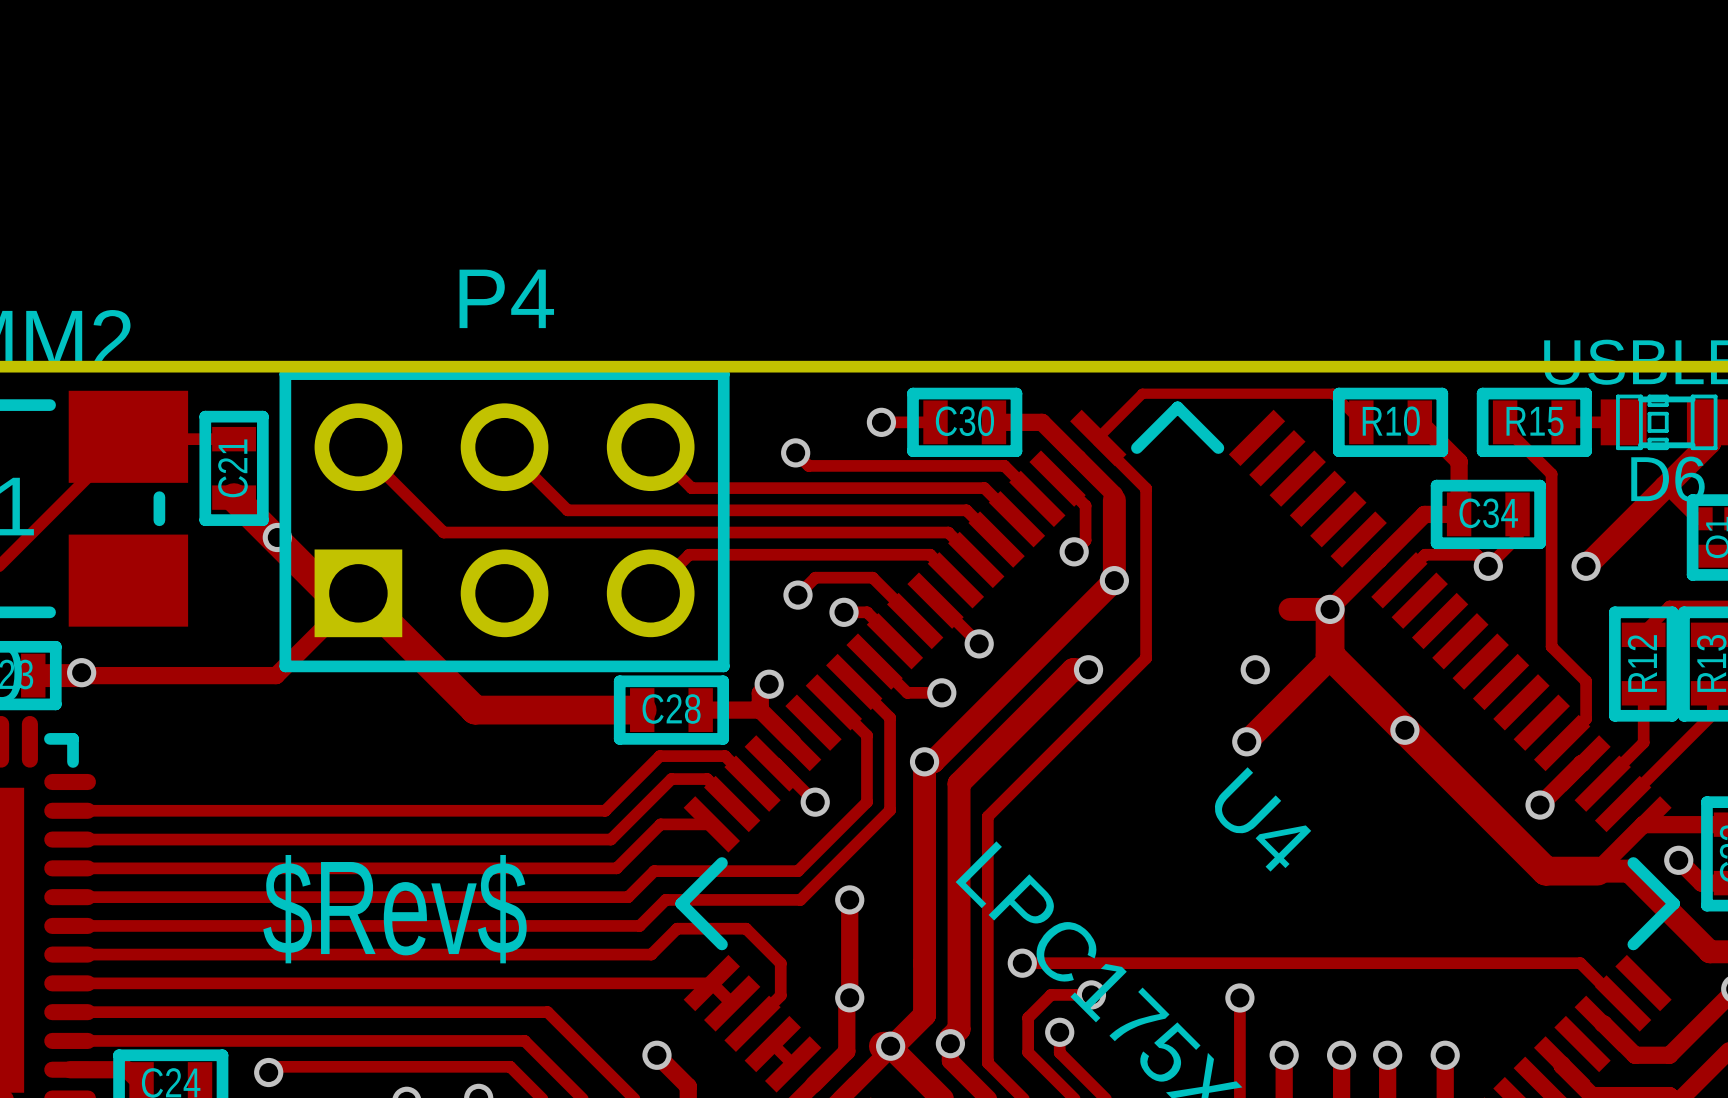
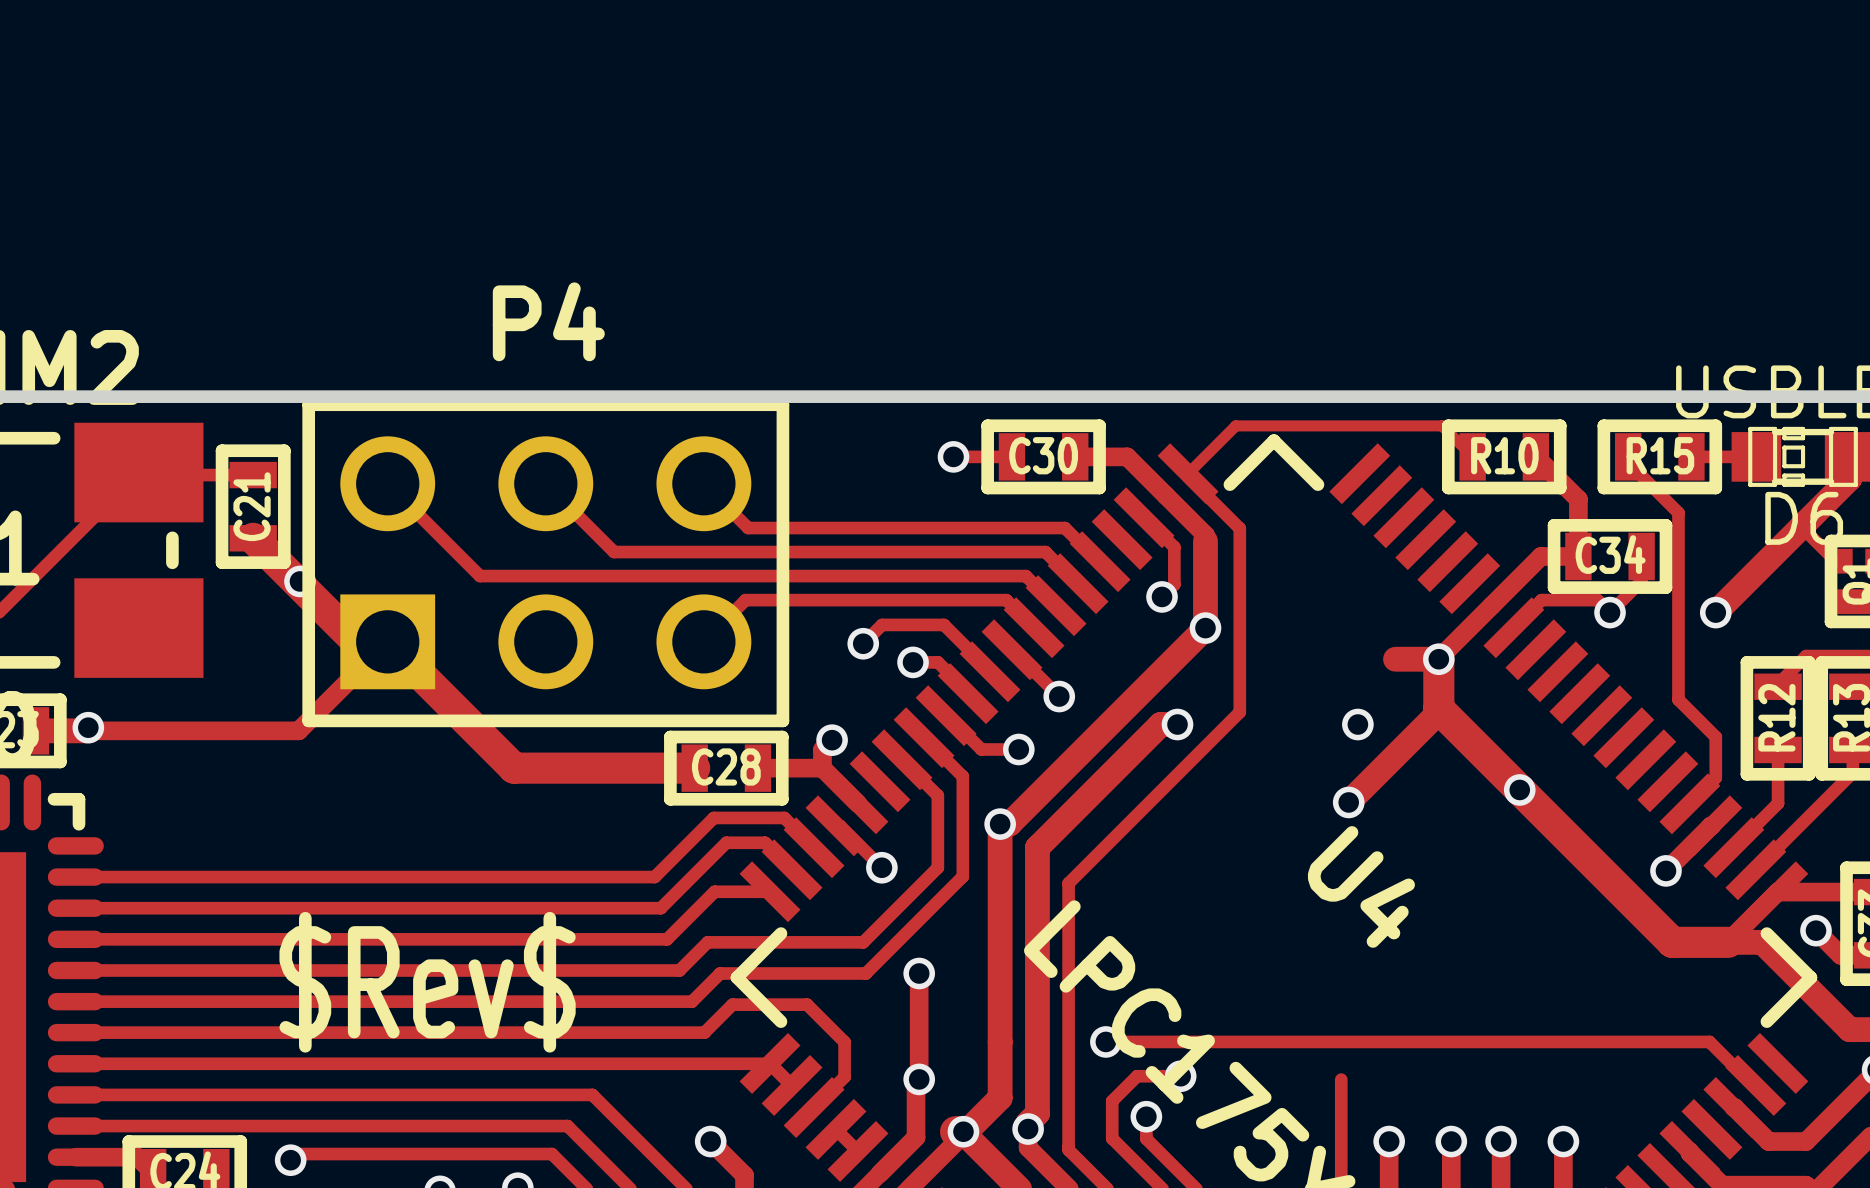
track: (795, 452) (808, 465) (1004, 465) (1037, 498) -> none
via: (795, 452) -> none
via: (1239, 997) -> none

